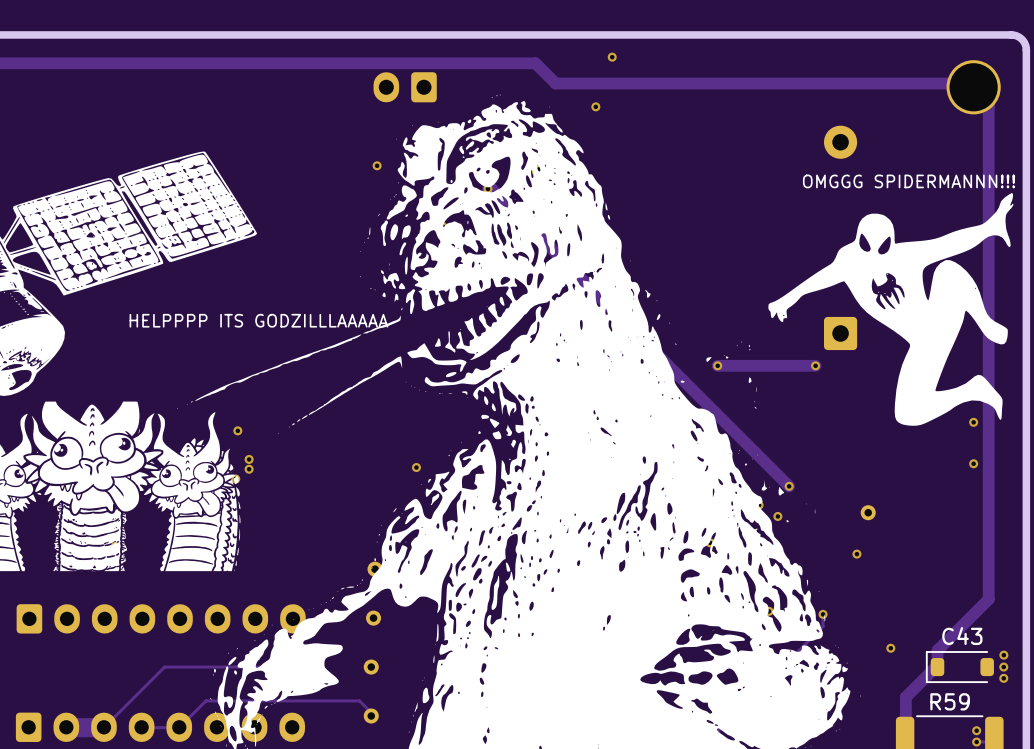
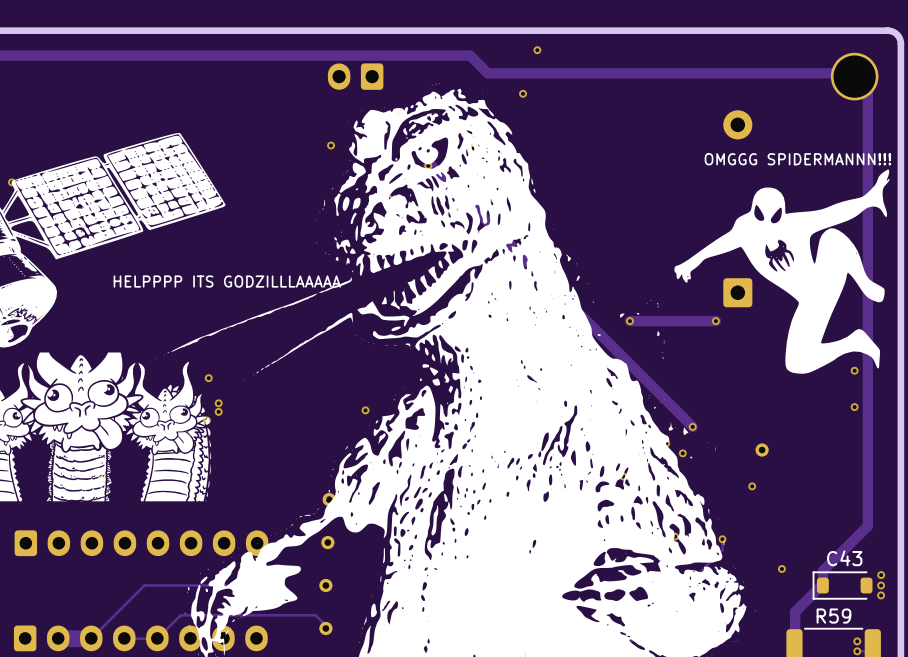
via: none -> (11, 182)

